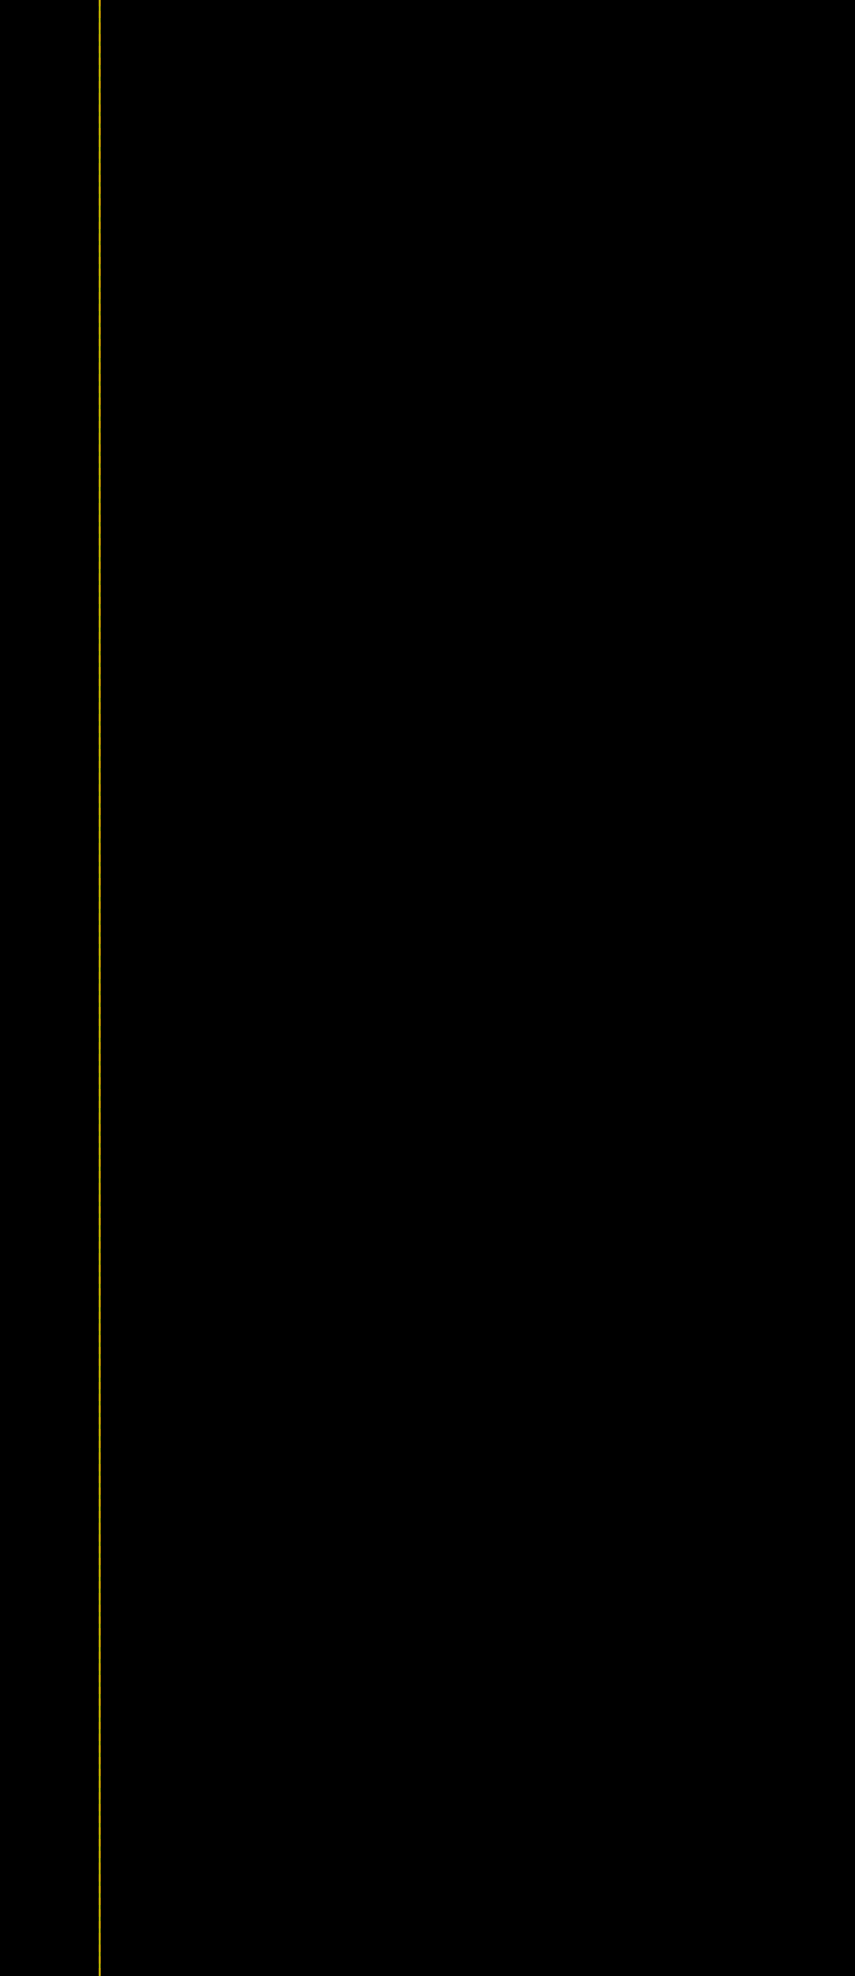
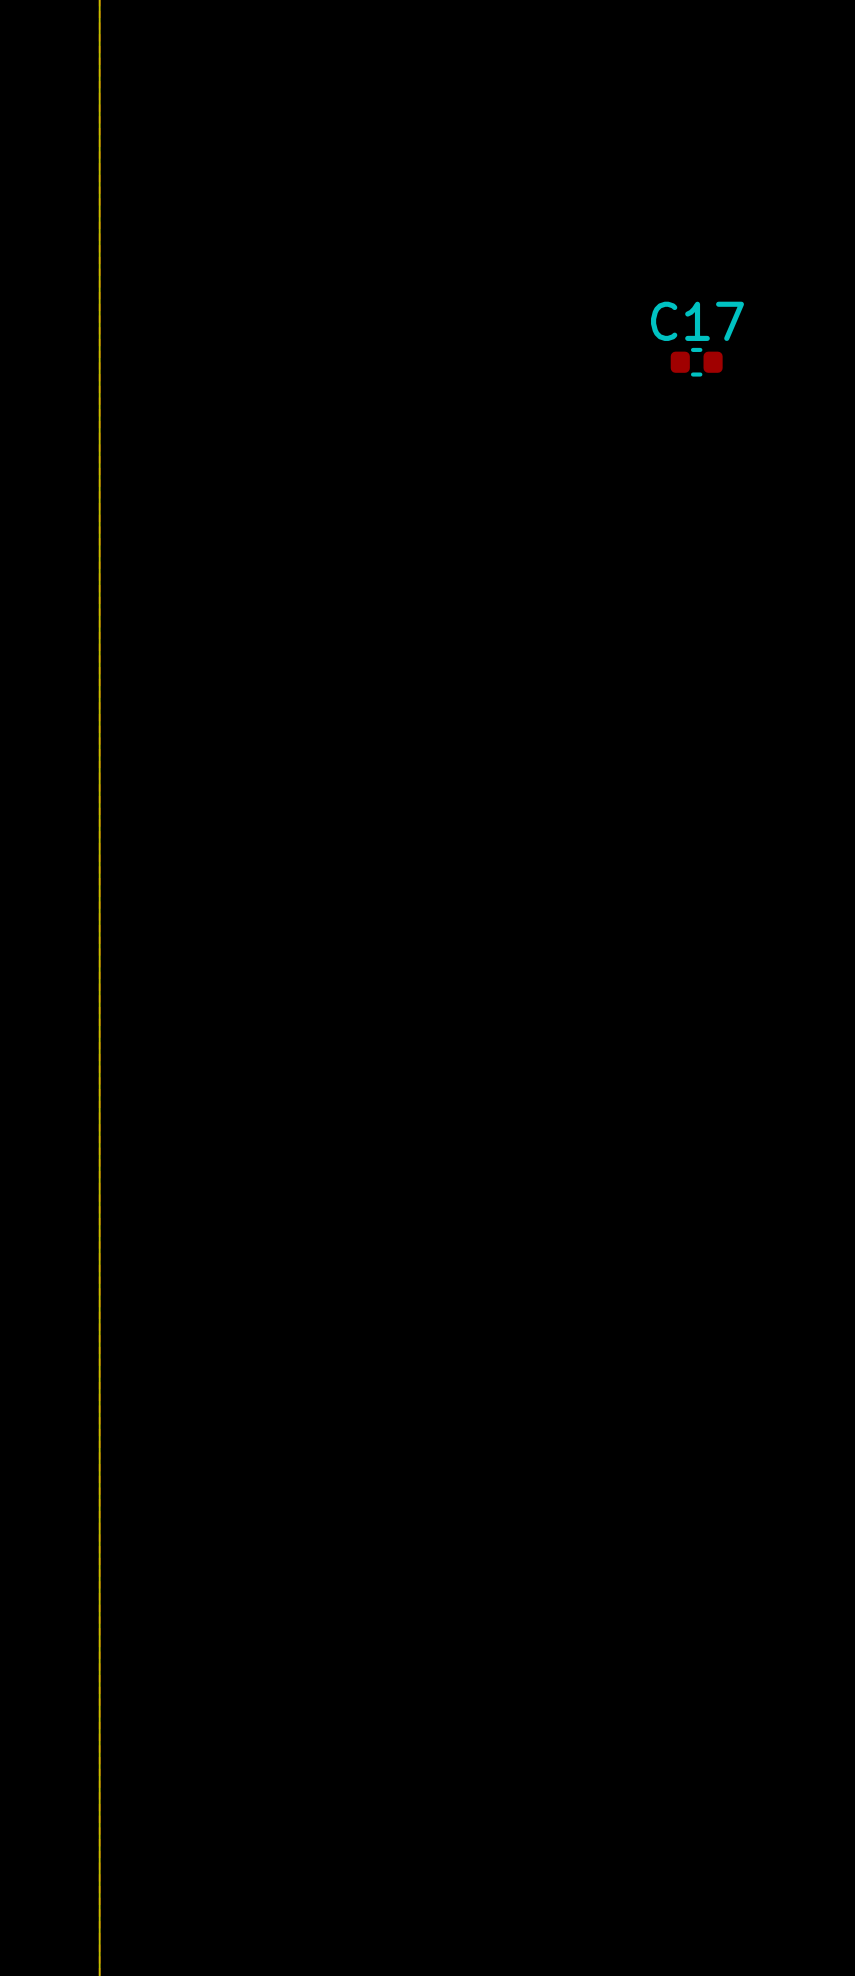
C17: none -> (696, 362)

